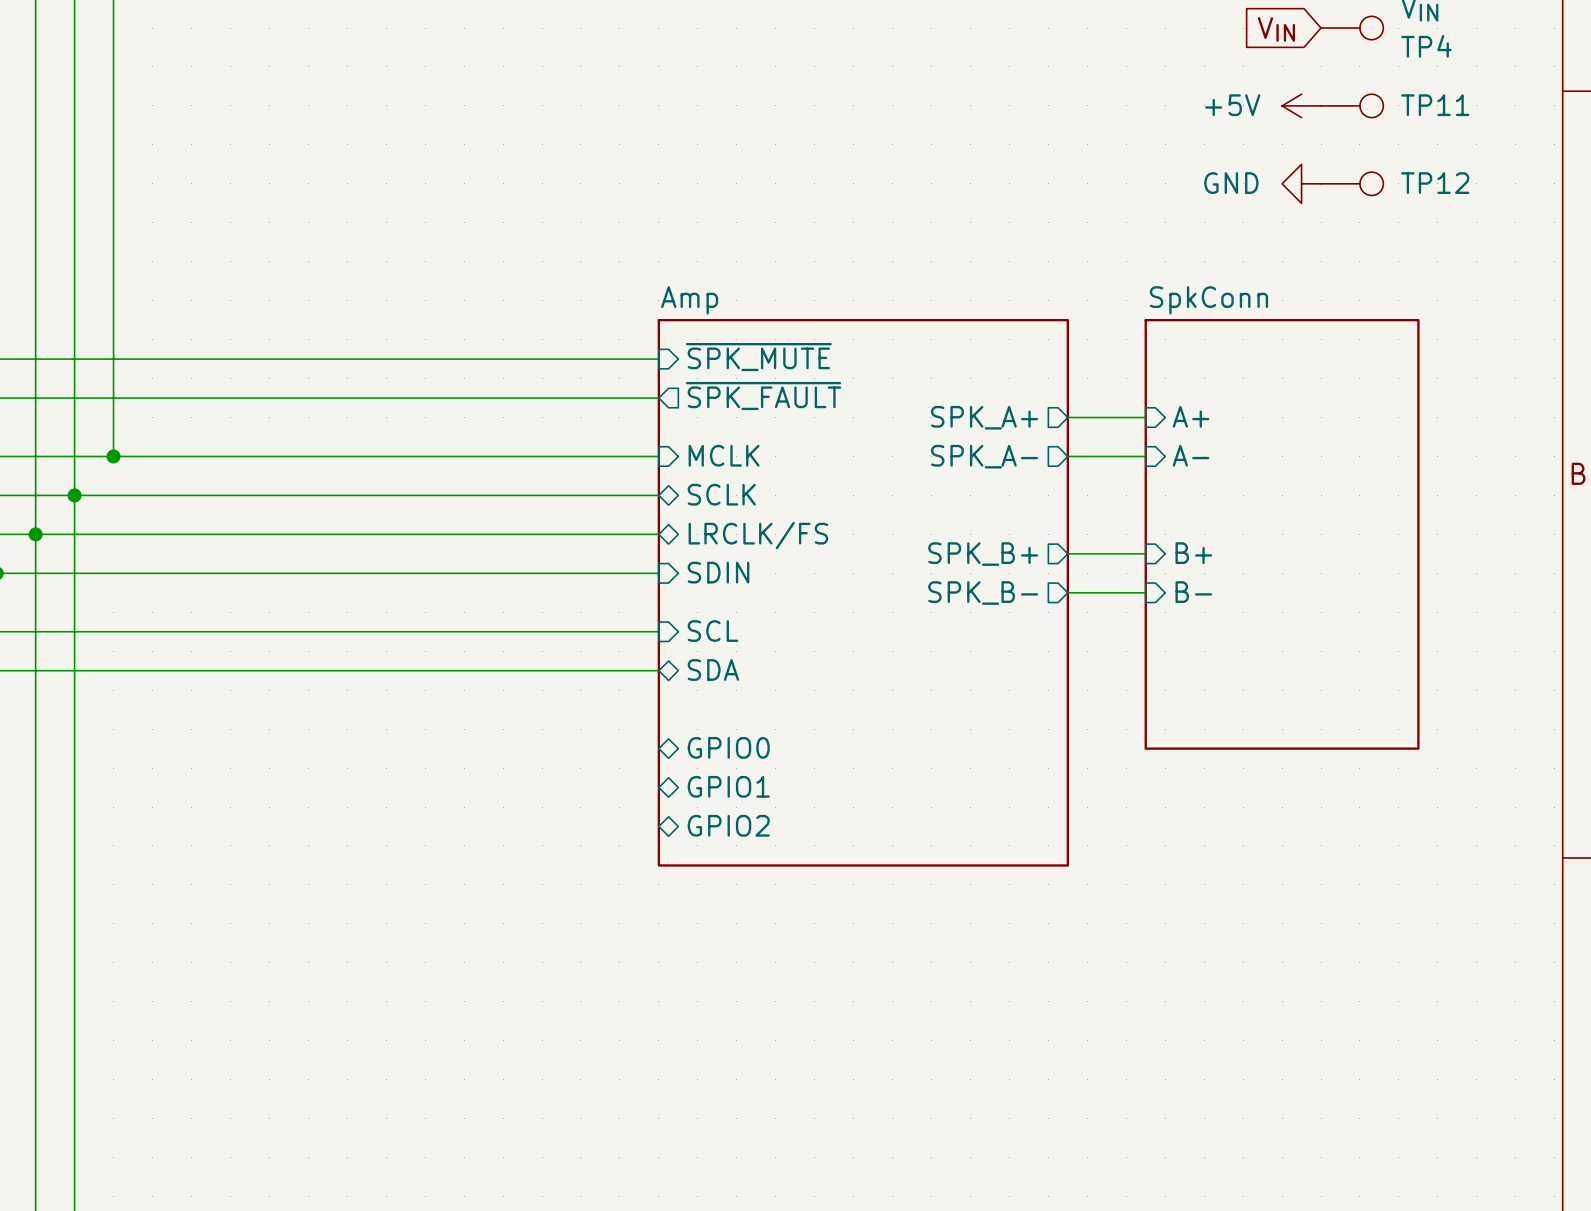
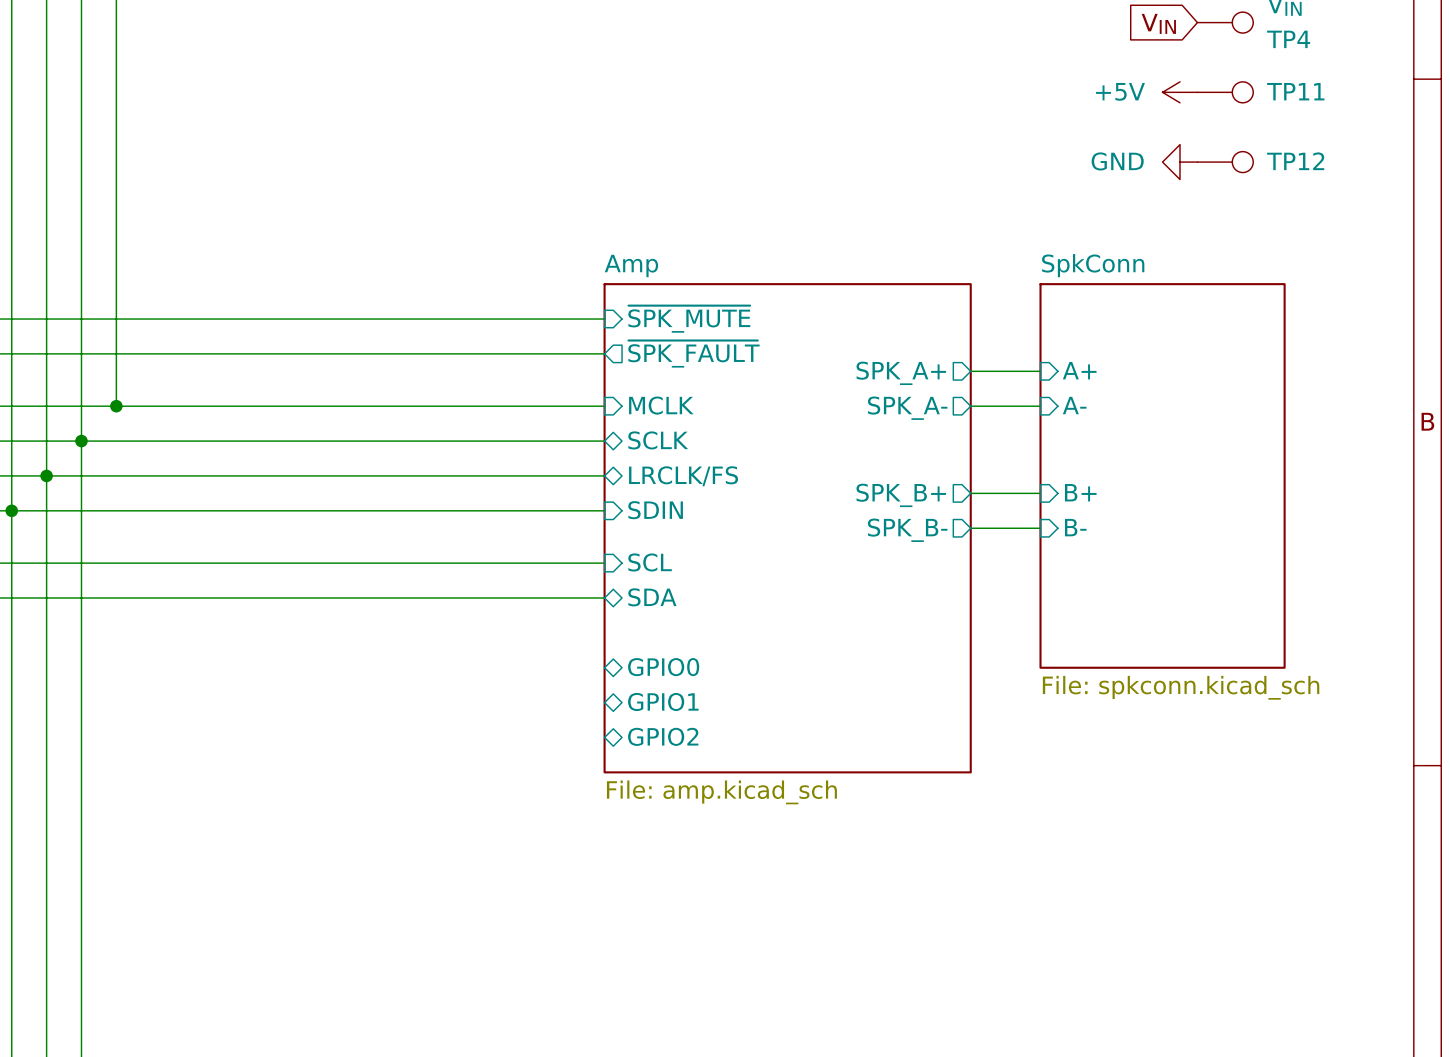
sheet SpkConn value: none -> File: spkconn.kicad_sch (1181, 687)
sheet Amp value: none -> File: amp.kicad_sch (721, 792)

